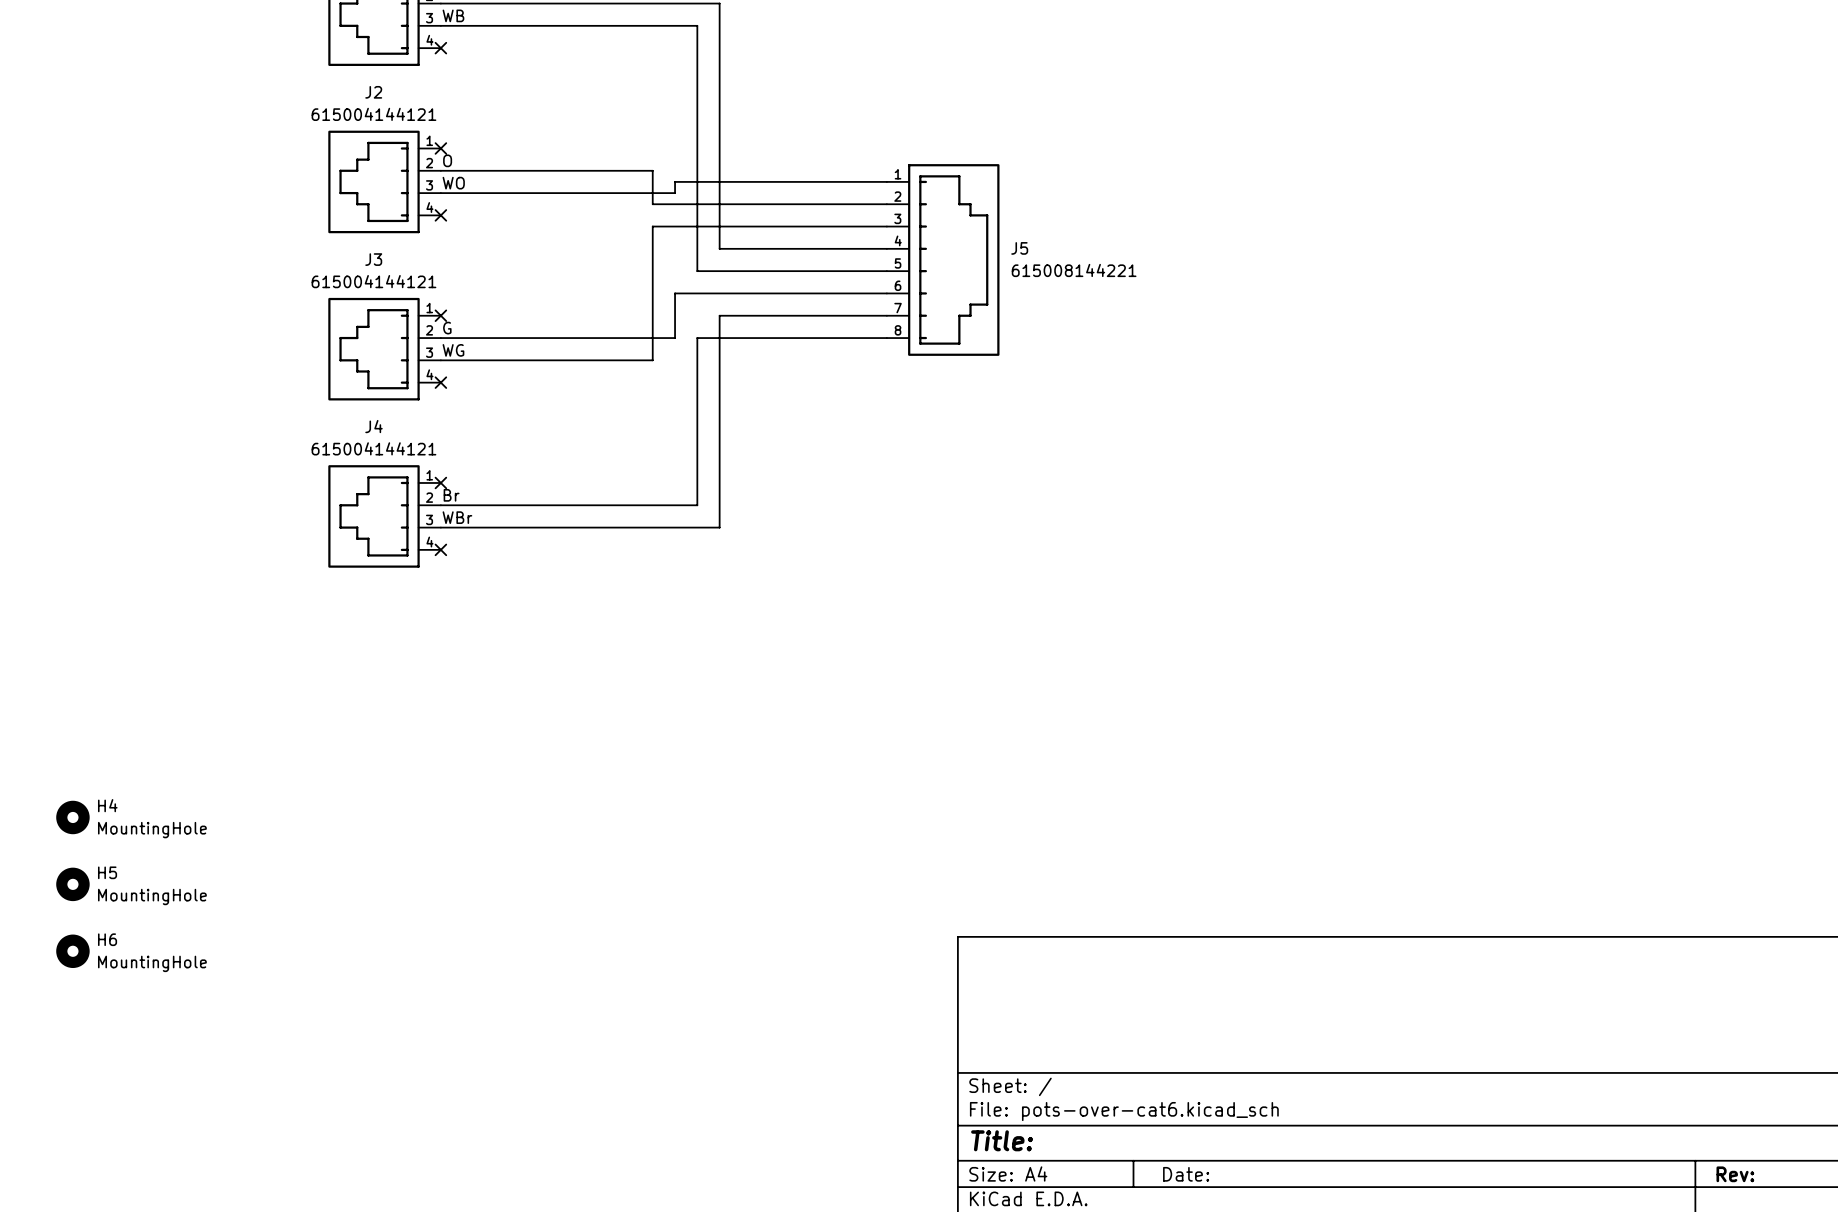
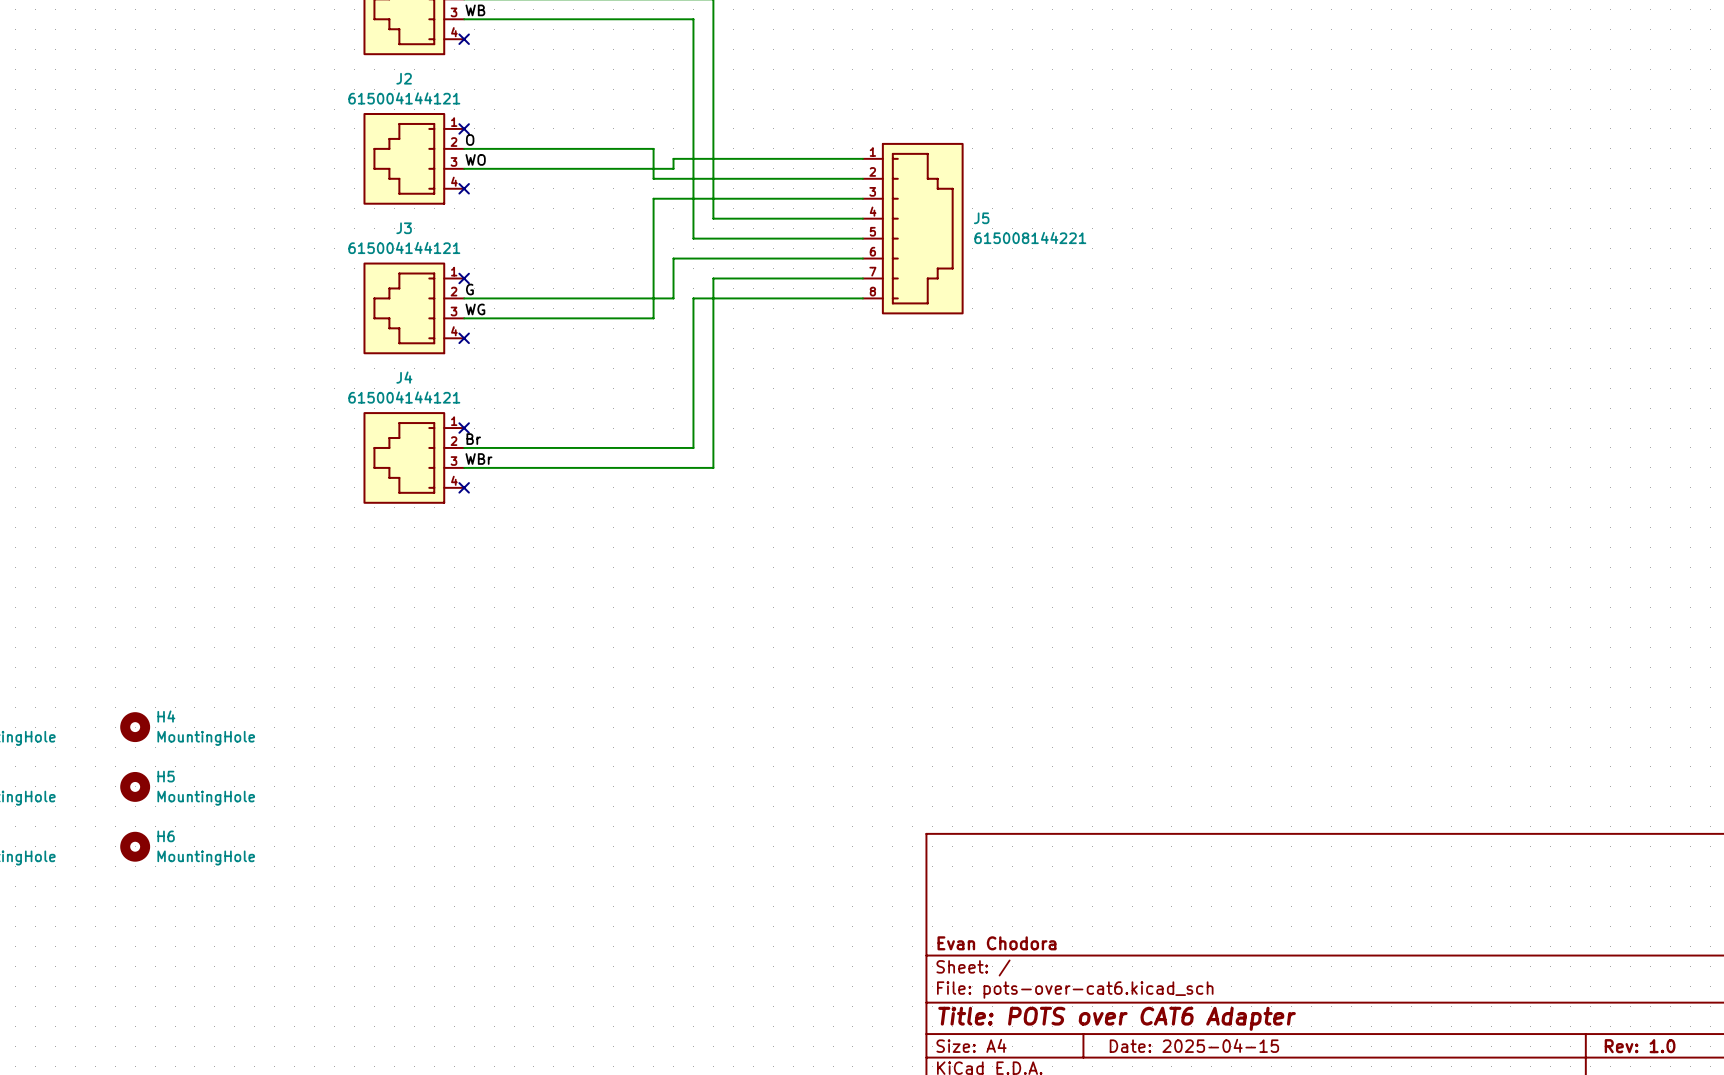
title block: none -> Evan Chodora (996, 943)
title block: Title: (1002, 1140) -> Title: POTS over CAT6 Adapter (1117, 1018)
title block: Date: (1186, 1174) -> Date: 2025-04-15 (1194, 1045)
title block: Rev: (1735, 1174) -> Rev: 1.0 (1640, 1046)

